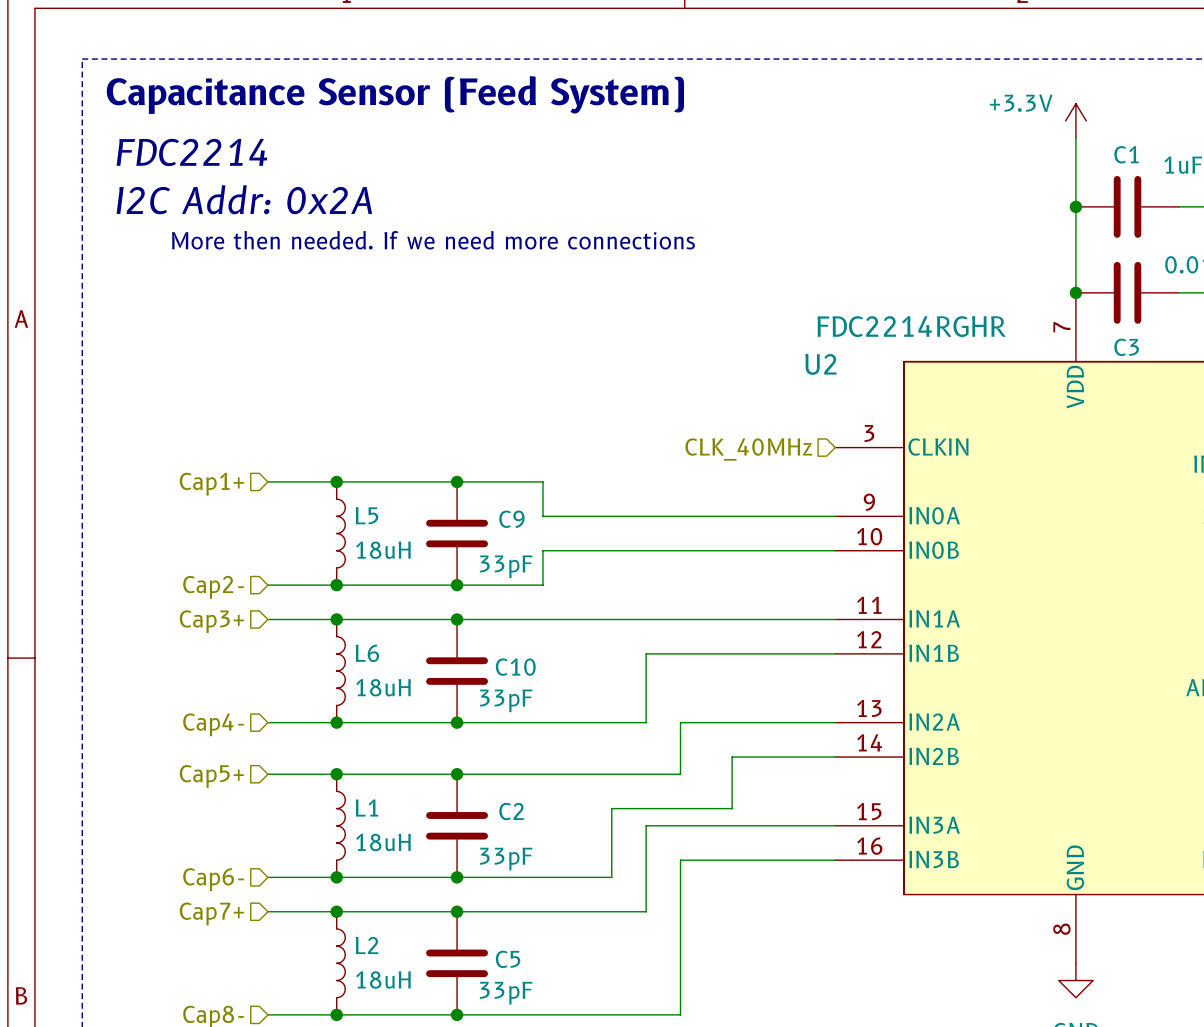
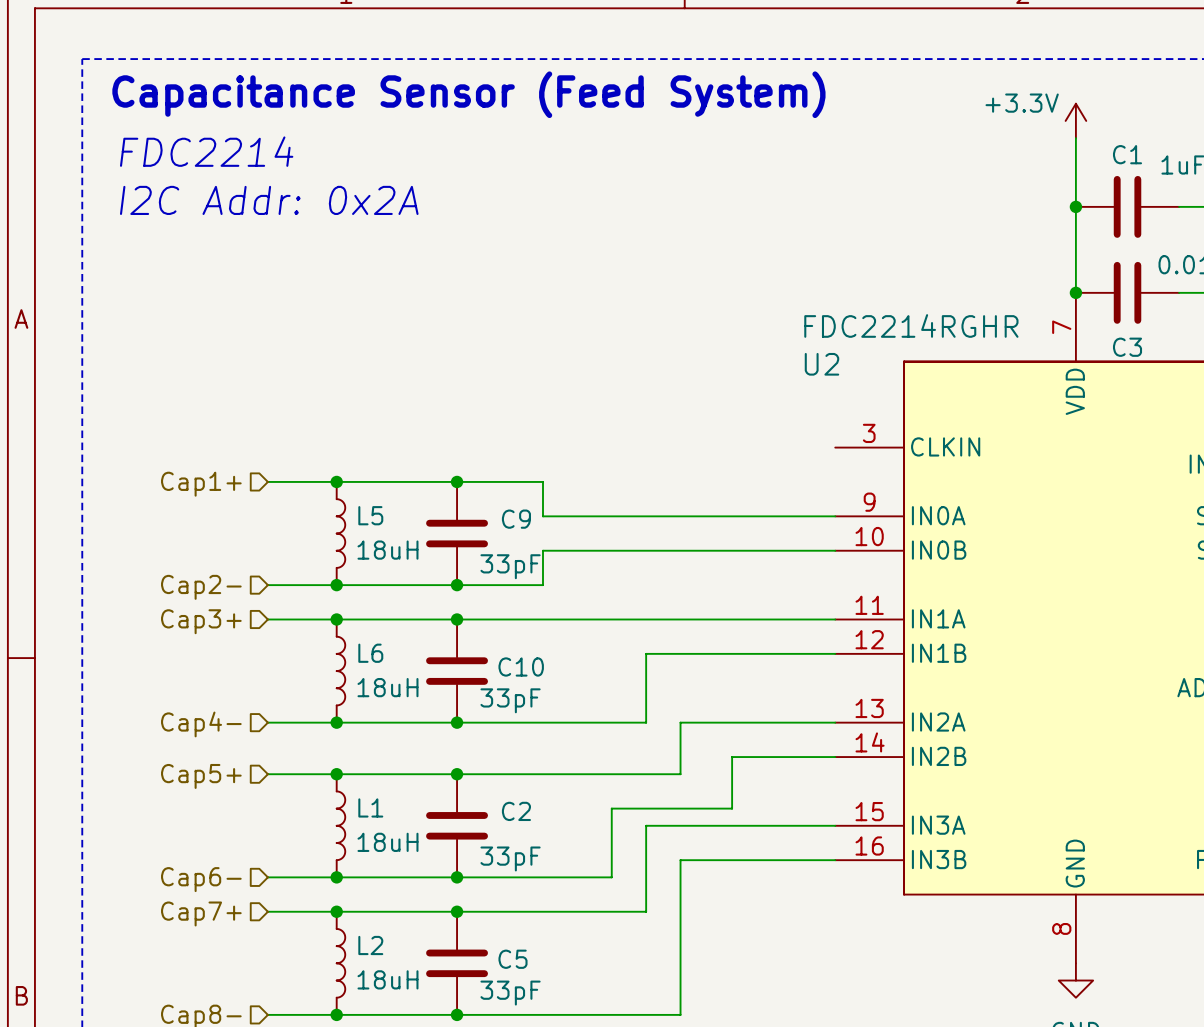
text: More then needed. If we need more connections (433, 240) -> none
hierarchical label: CLK_40MHz (748, 449) -> none

